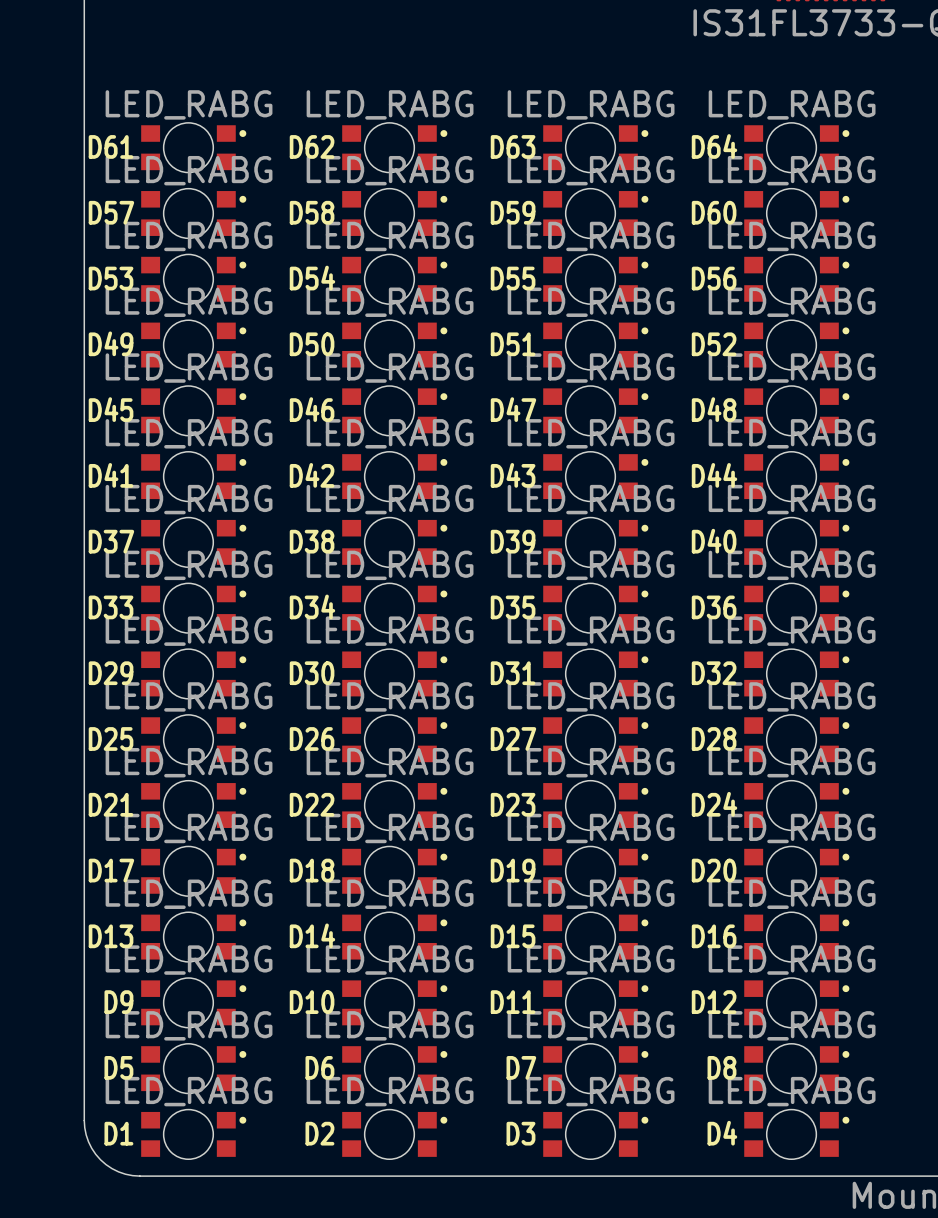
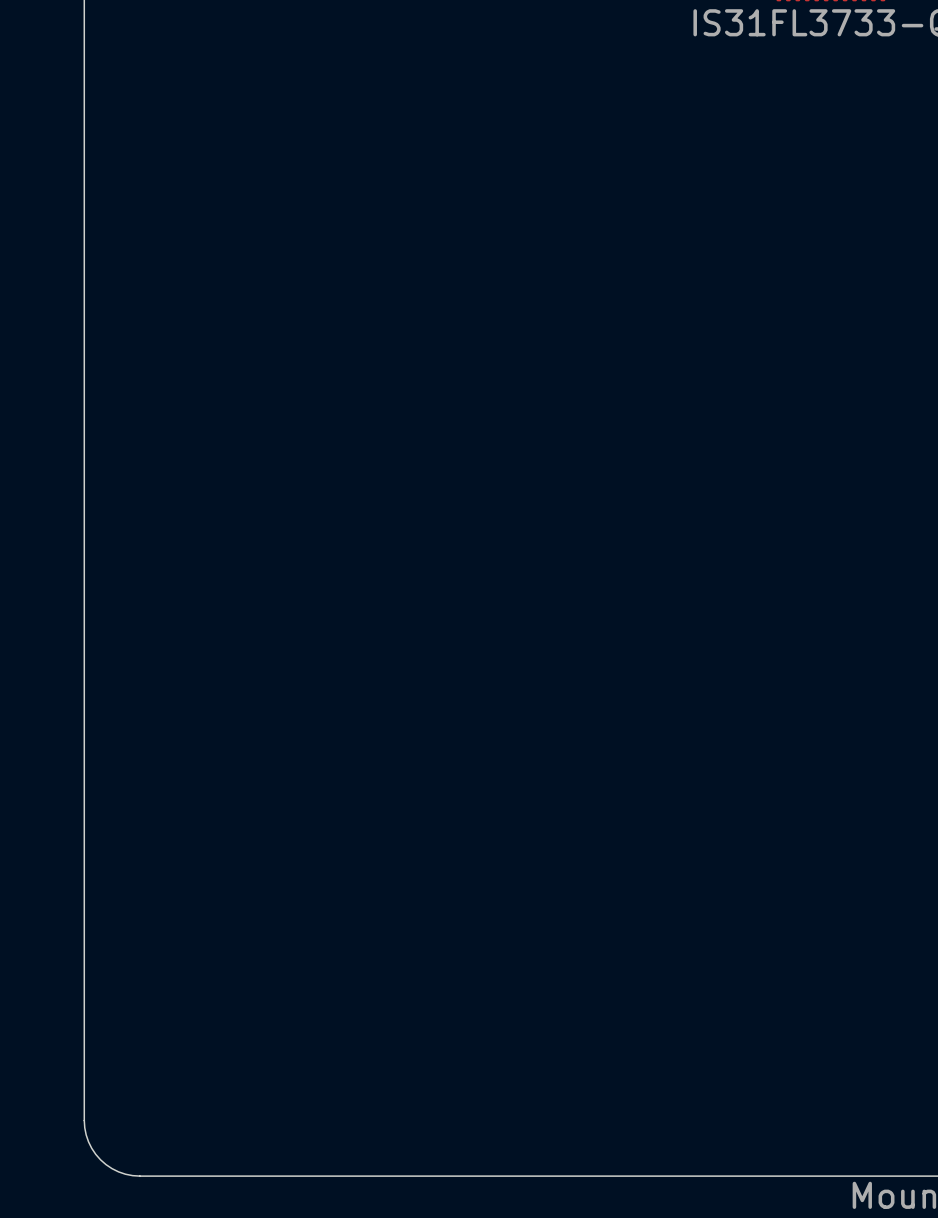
D61: LED_RABG (193, 147) -> none
D62: LED_RABG (394, 147) -> none
D63: LED_RABG (595, 147) -> none
D64: LED_RABG (796, 147) -> none
D57: LED_RABG (193, 213) -> none
D58: LED_RABG (394, 213) -> none
D59: LED_RABG (595, 213) -> none
D60: LED_RABG (796, 213) -> none
D53: LED_RABG (193, 279) -> none
D54: LED_RABG (394, 279) -> none
D55: LED_RABG (595, 279) -> none
D56: LED_RABG (796, 279) -> none
D49: LED_RABG (193, 345) -> none
D50: LED_RABG (394, 345) -> none
D51: LED_RABG (595, 345) -> none
D52: LED_RABG (796, 345) -> none
D45: LED_RABG (193, 410) -> none
D46: LED_RABG (394, 410) -> none
D47: LED_RABG (595, 410) -> none
D48: LED_RABG (796, 410) -> none
D41: LED_RABG (193, 476) -> none
D42: LED_RABG (394, 476) -> none
D43: LED_RABG (595, 476) -> none
D44: LED_RABG (796, 476) -> none
D37: LED_RABG (193, 542) -> none
D38: LED_RABG (394, 542) -> none
D39: LED_RABG (595, 542) -> none
D40: LED_RABG (796, 542) -> none
D33: LED_RABG (193, 608) -> none
D34: LED_RABG (394, 608) -> none
D35: LED_RABG (595, 608) -> none
D36: LED_RABG (796, 608) -> none
D29: LED_RABG (193, 673) -> none
D30: LED_RABG (394, 673) -> none
D31: LED_RABG (595, 673) -> none
D32: LED_RABG (796, 673) -> none
D25: LED_RABG (193, 739) -> none
D26: LED_RABG (394, 739) -> none
D27: LED_RABG (595, 739) -> none
D28: LED_RABG (796, 739) -> none
D21: LED_RABG (193, 805) -> none
D22: LED_RABG (394, 805) -> none
D23: LED_RABG (595, 805) -> none
D24: LED_RABG (796, 805) -> none
D17: LED_RABG (193, 871) -> none
D18: LED_RABG (394, 871) -> none
D19: LED_RABG (595, 871) -> none
D20: LED_RABG (796, 871) -> none
D13: LED_RABG (193, 937) -> none
D14: LED_RABG (394, 937) -> none
D15: LED_RABG (595, 937) -> none
D16: LED_RABG (796, 937) -> none
D9: LED_RABG (193, 1002) -> none
D10: LED_RABG (394, 1002) -> none
D11: LED_RABG (595, 1002) -> none
D12: LED_RABG (796, 1002) -> none
D5: LED_RABG (193, 1068) -> none
D6: LED_RABG (394, 1068) -> none
D7: LED_RABG (595, 1068) -> none
D8: LED_RABG (796, 1068) -> none
D1: LED_RABG (193, 1134) -> none
D2: LED_RABG (394, 1134) -> none
D3: LED_RABG (595, 1134) -> none
D4: LED_RABG (796, 1134) -> none

